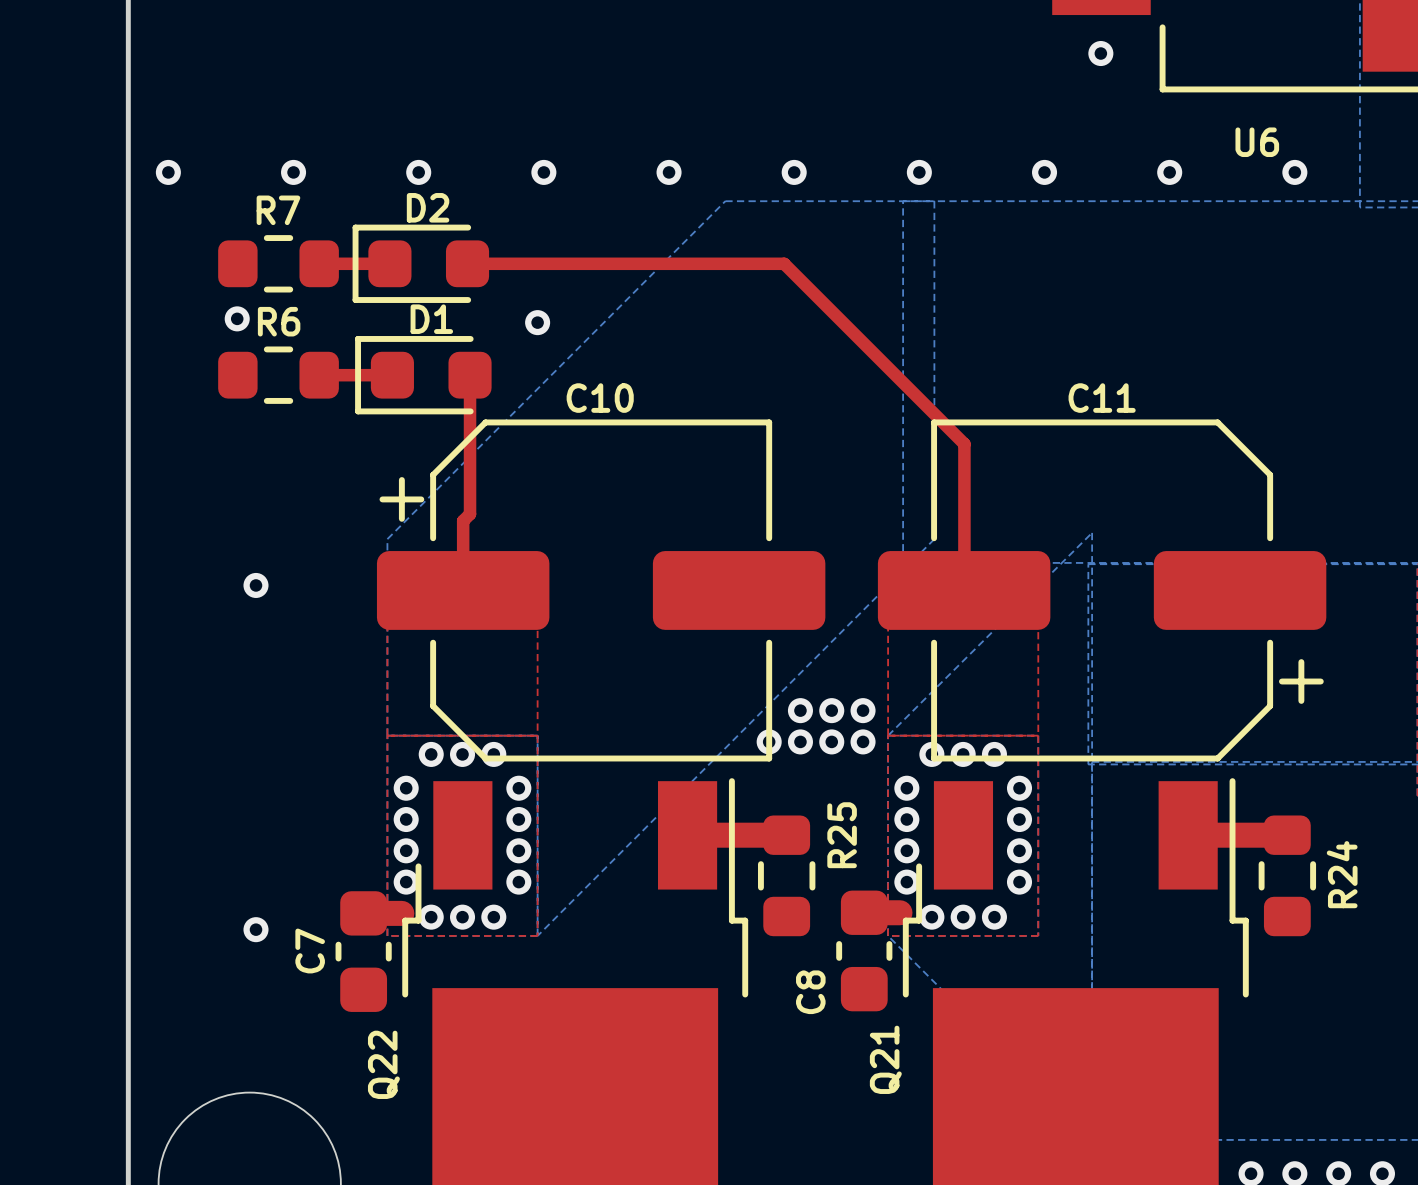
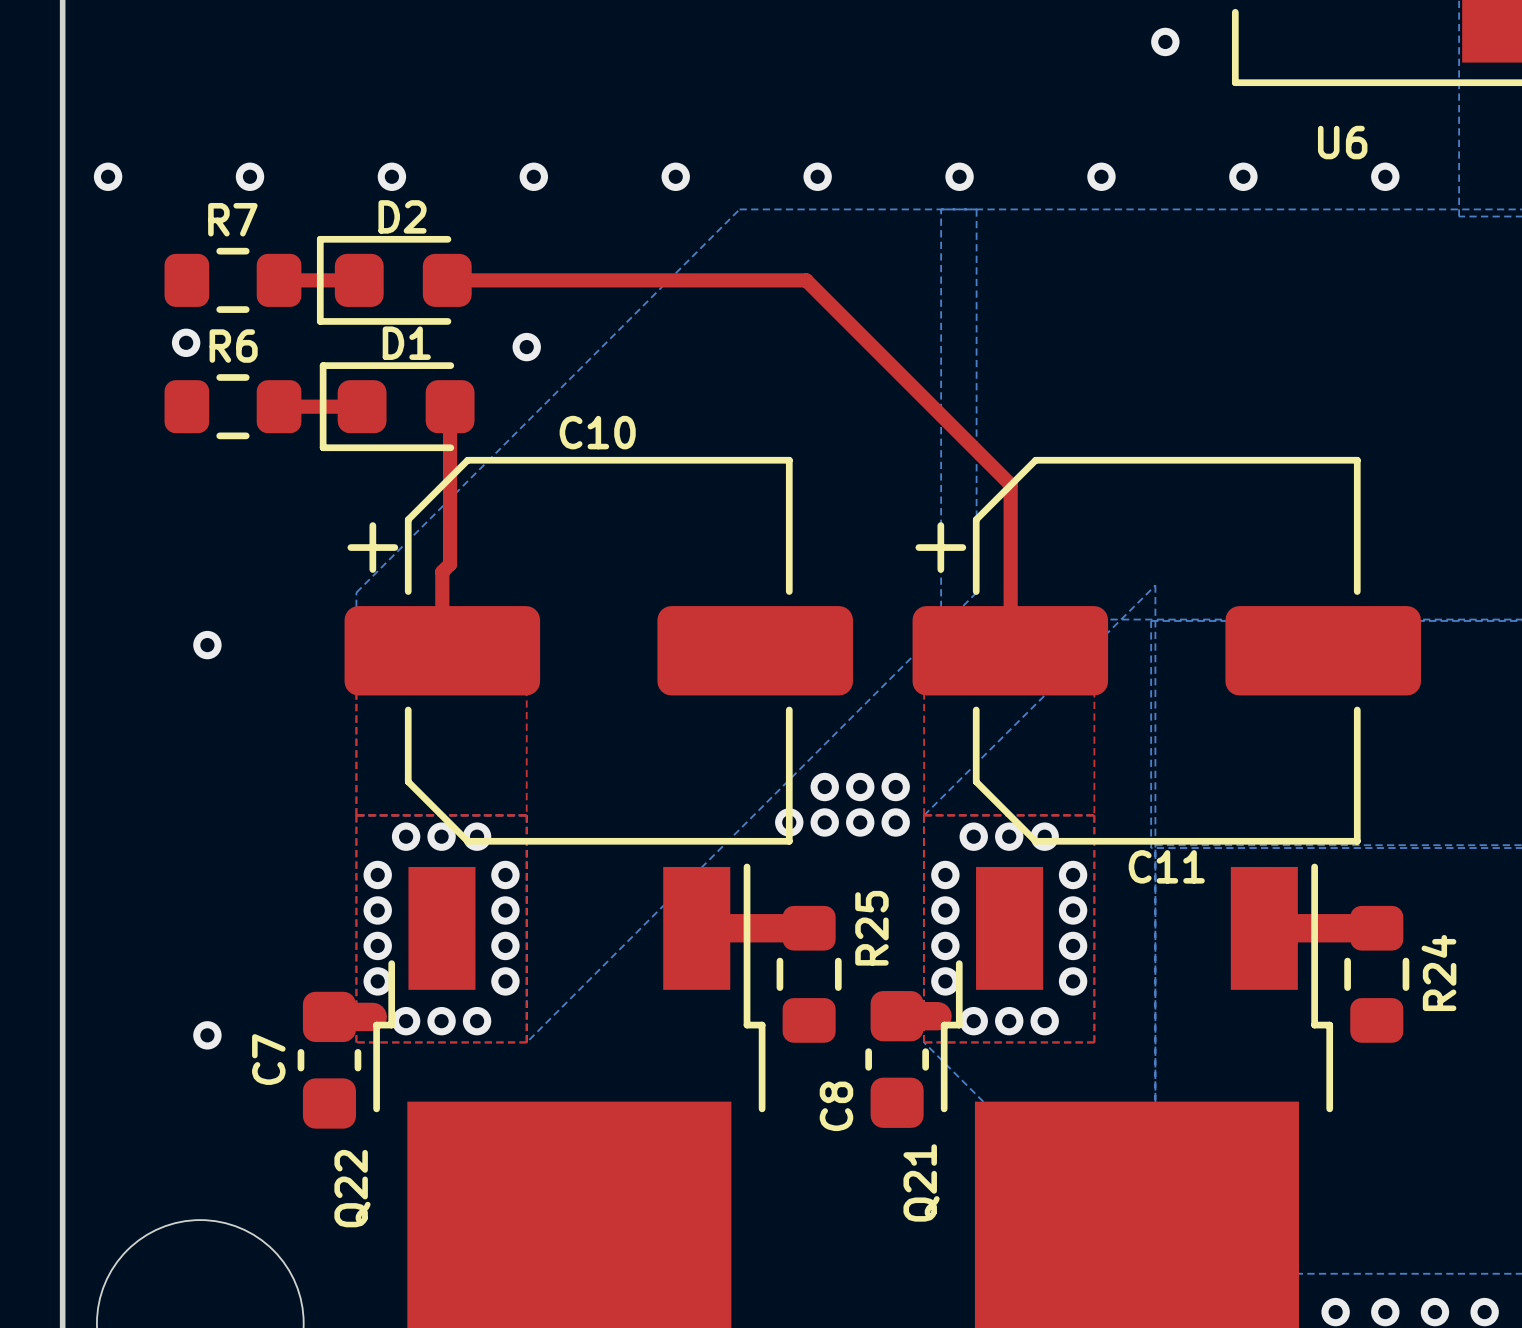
C11 rotation: 0° (1102, 590) -> 180° (1166, 650)

